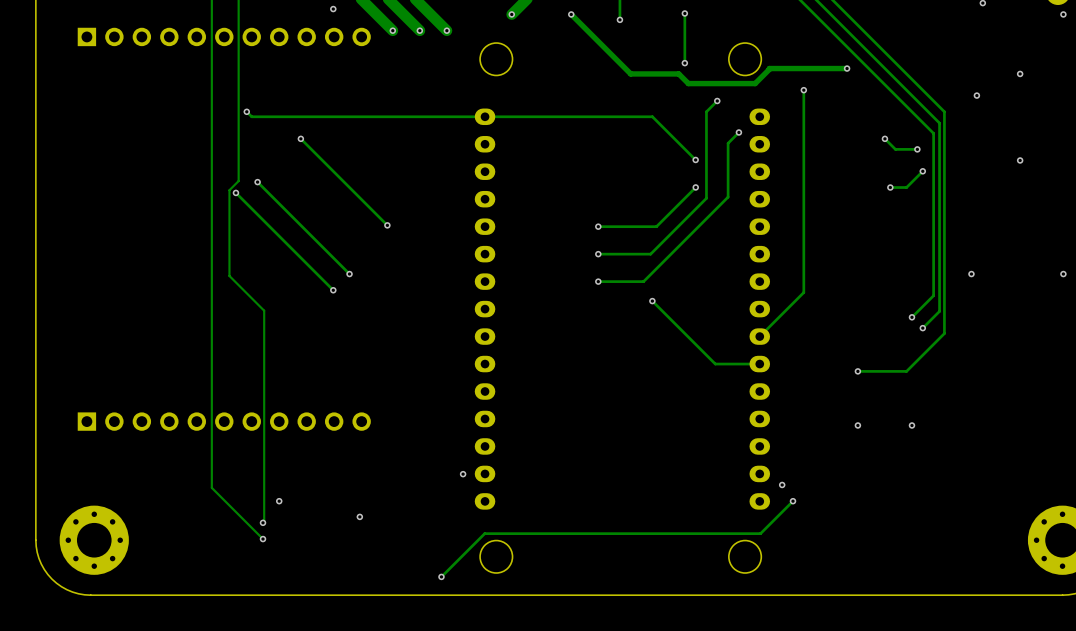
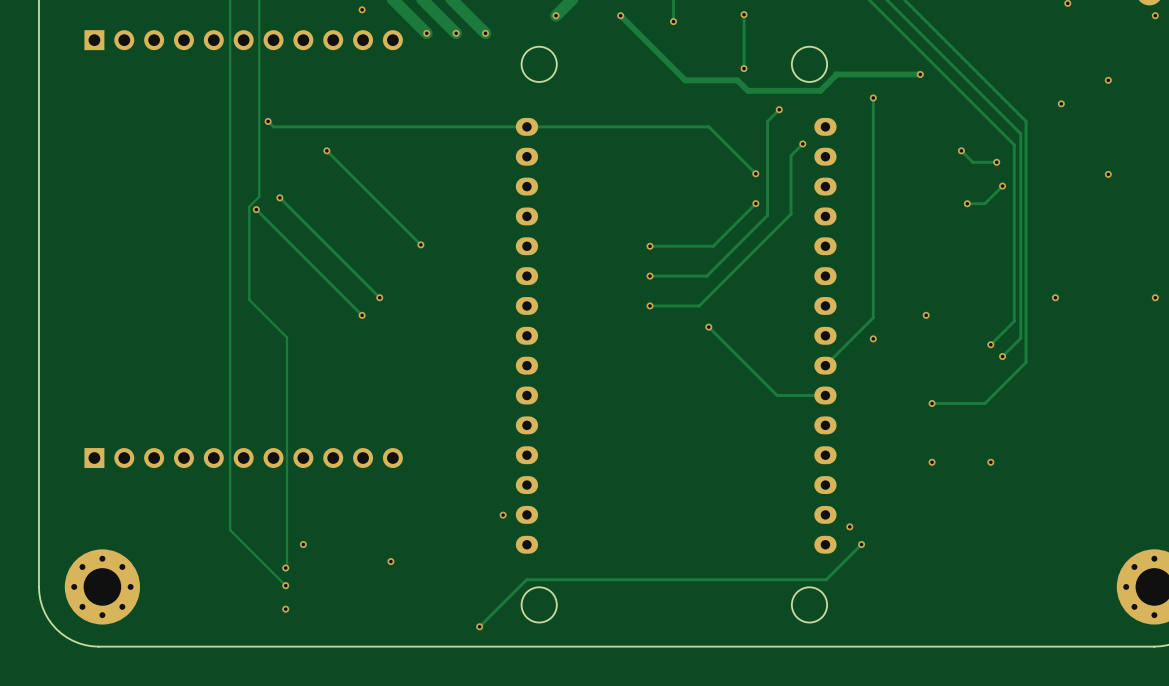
via: none -> (926, 315)
via: none -> (873, 338)
via: none -> (285, 609)

